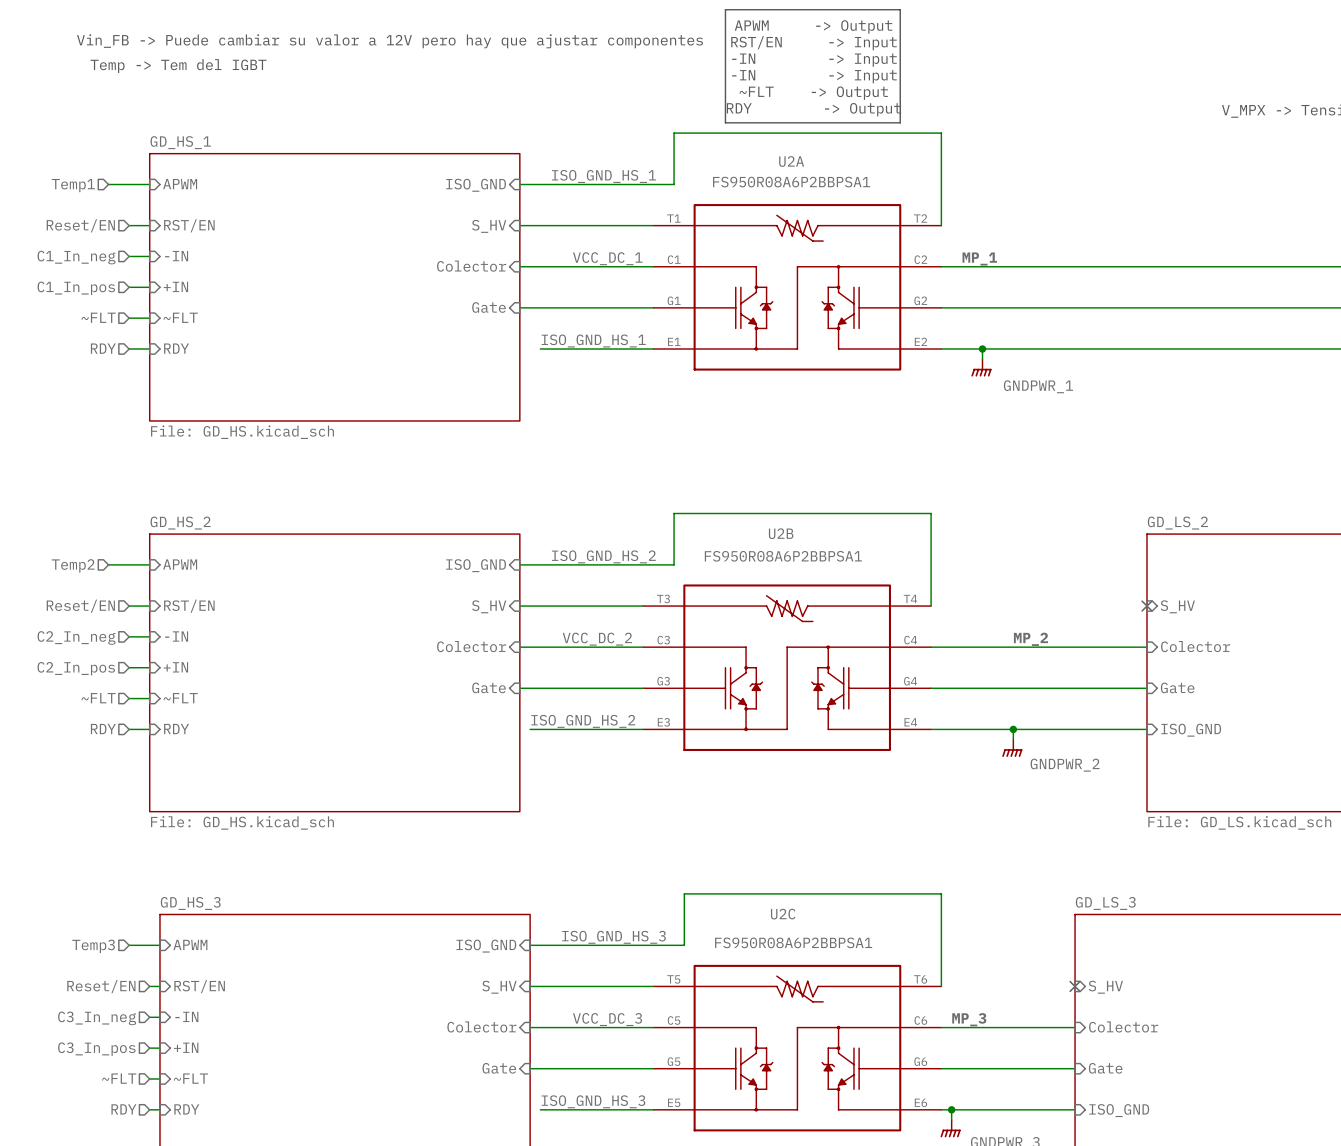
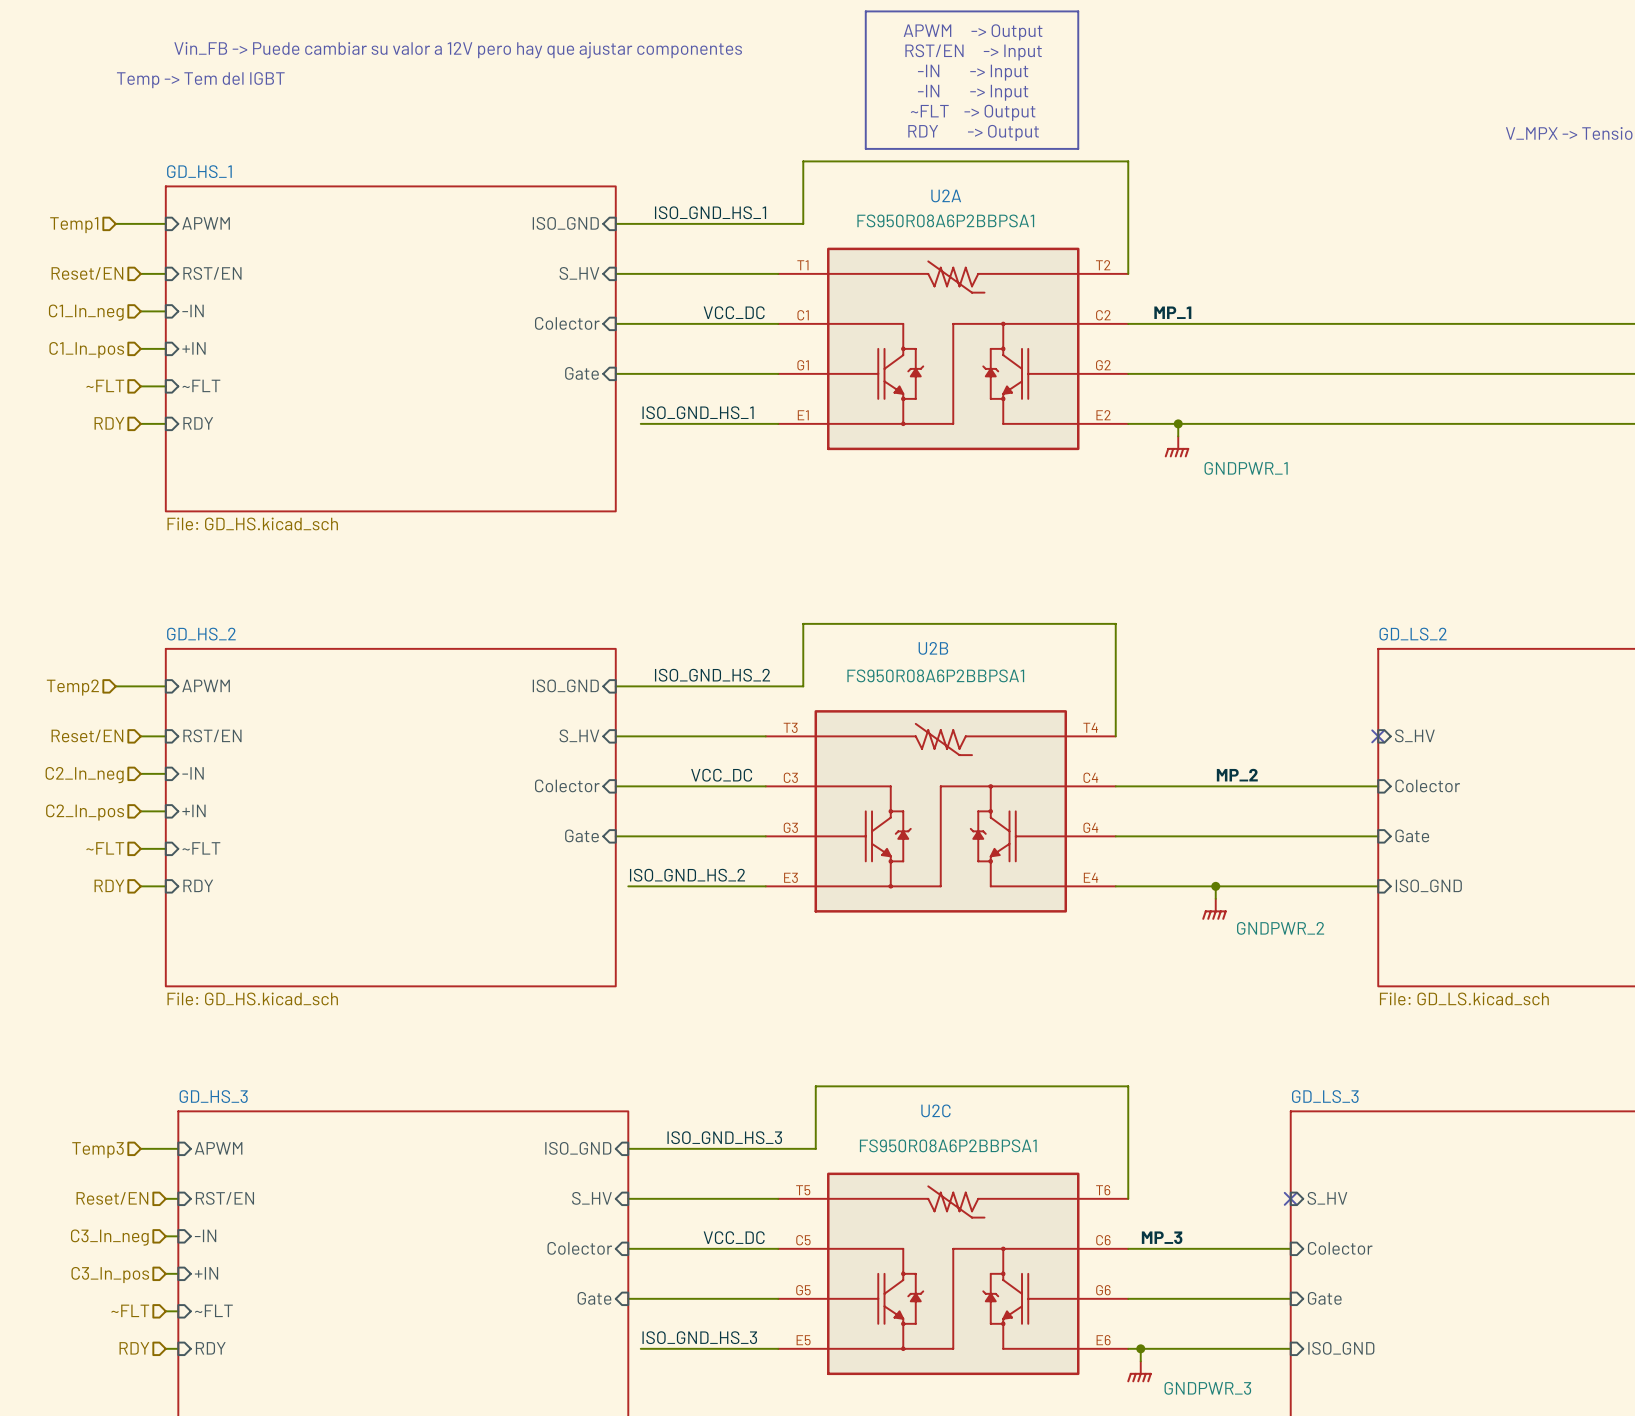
label: VCC_DC_1 (607, 258) -> VCC_DC (734, 312)
label: VCC_DC_2 (597, 639) -> VCC_DC (721, 775)
label: VCC_DC_3 (607, 1019) -> VCC_DC (734, 1237)

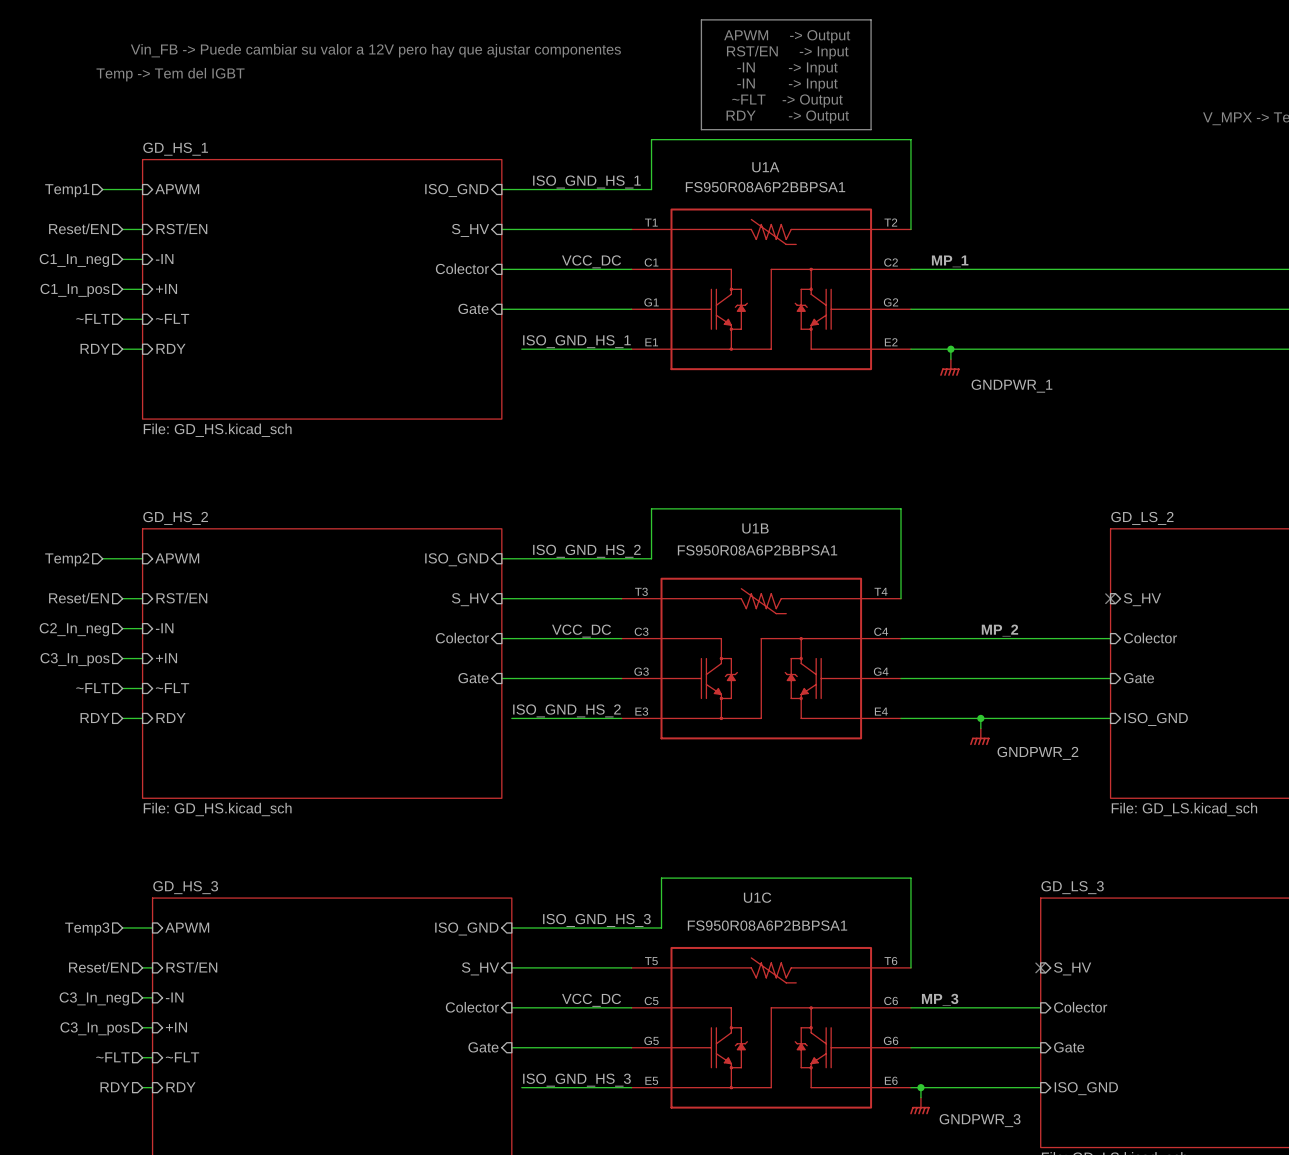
U2A name: U2A (946, 195) -> U1A (765, 167)
U2B name: U2B (933, 648) -> U1B (755, 528)
hierarchical label: C2_In_pos (85, 812) -> C3_In_pos (74, 659)
U2C name: U2C (935, 1110) -> U1C (757, 897)

